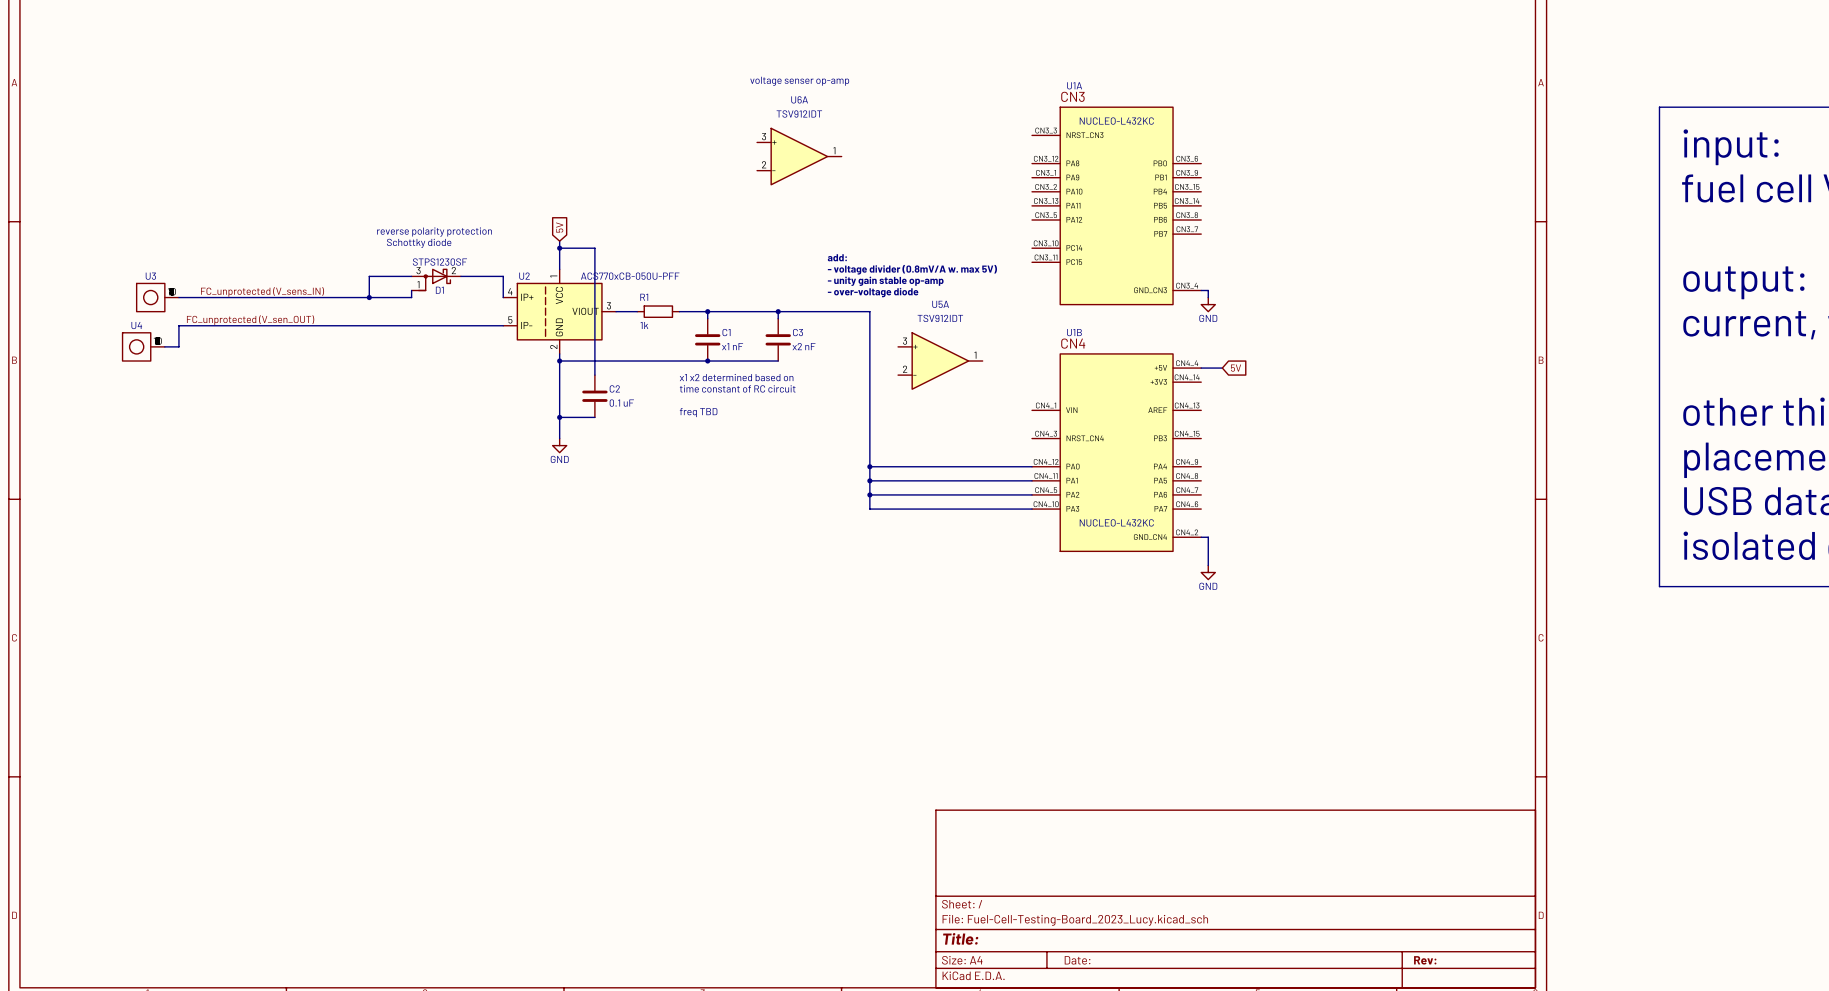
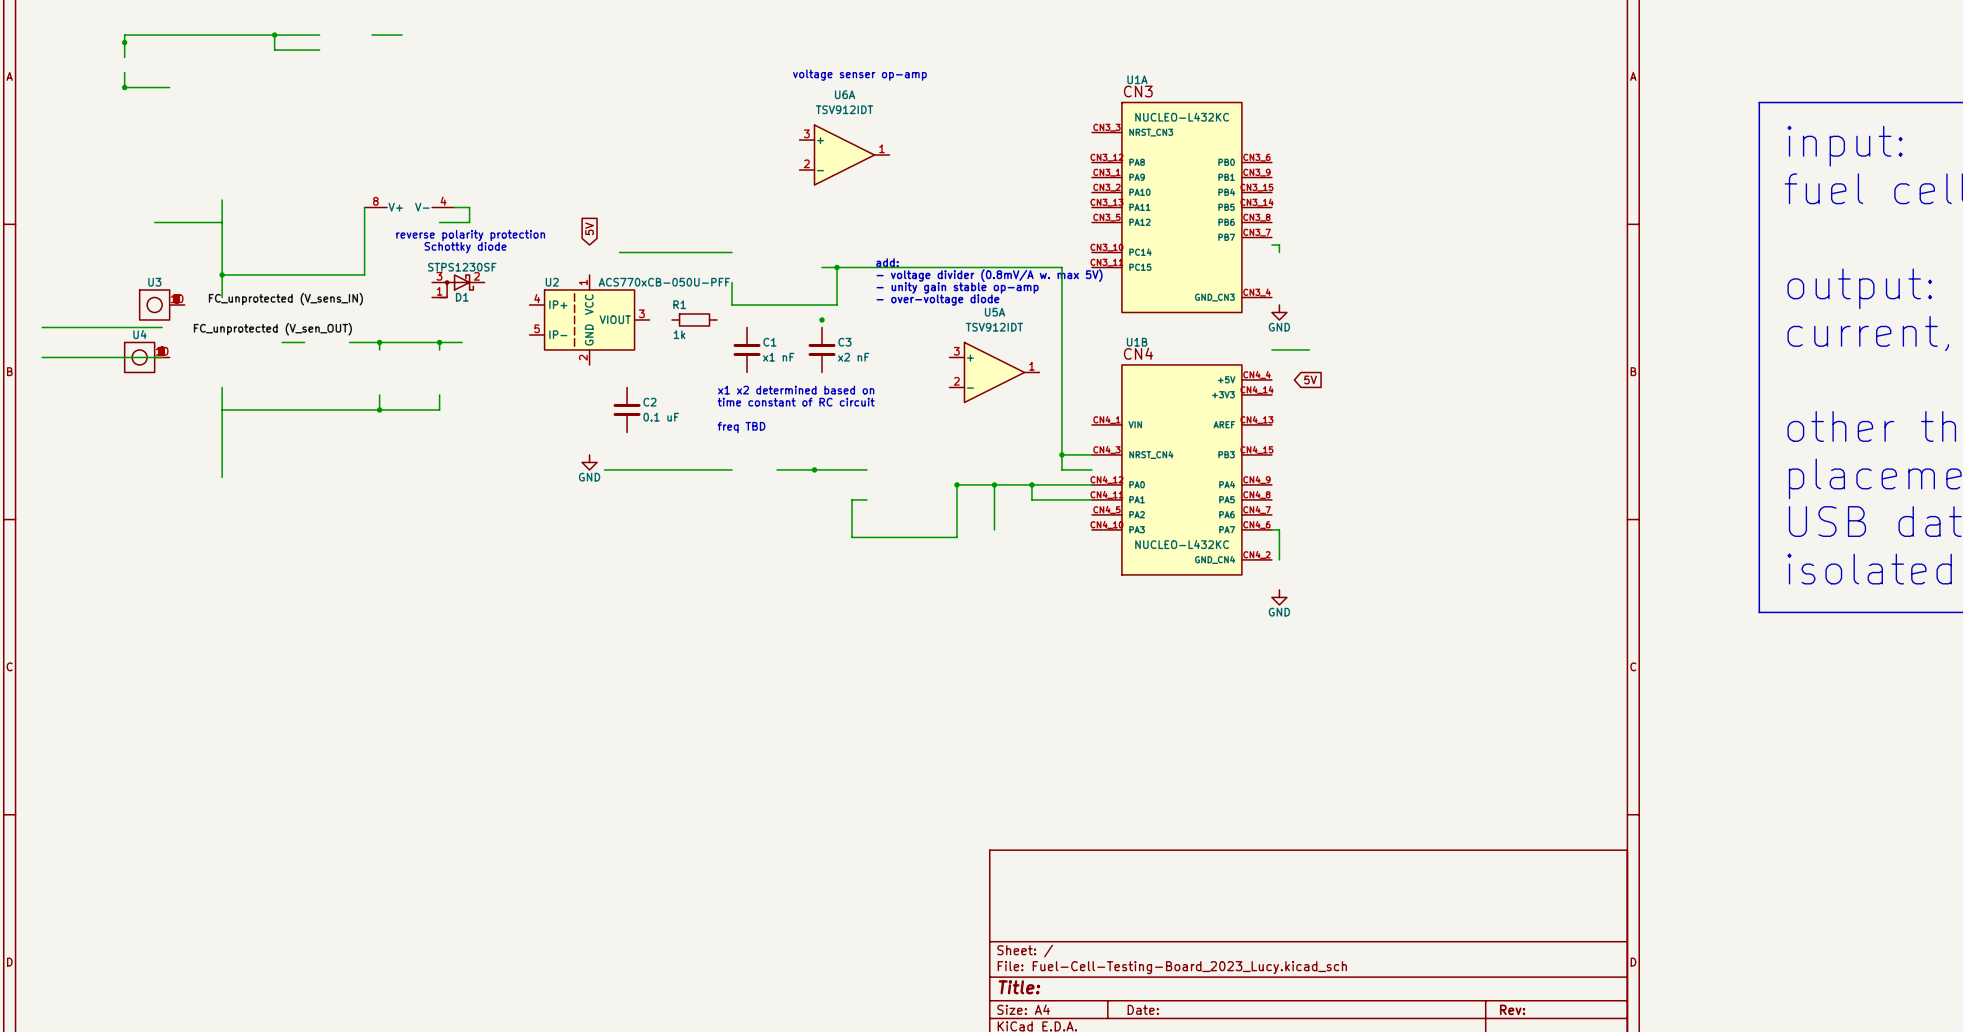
wire: none -> (274, 35) (274, 50) (319, 50)
junction: none -> (274, 35)
wire: none -> (319, 35) (124, 35) (124, 57)
wire: none -> (372, 35) (402, 35)
junction: none -> (124, 42)
wire: none -> (124, 72) (124, 87) (169, 87)
junction: none -> (124, 87)
wire: none -> (222, 200) (222, 297)
wire: none -> (364, 207) (364, 274) (222, 274)
part: none -> (409, 207)
wire: none -> (454, 207) (469, 207) (469, 222) (439, 222)
wire: none -> (154, 222) (222, 222)
wire: (559, 241) (559, 269) -> none
wire: (559, 248) (587, 248) -> none
junction: (559, 248) -> none
wire: (594, 248) (594, 375) -> (627, 252) (732, 252)
wire: none -> (822, 267) (1061, 267) (1061, 469) (1091, 469)
wire: none -> (837, 267) (837, 304) (732, 304) (732, 282)
junction: none -> (837, 267)
junction: none -> (222, 274)
wire: (411, 276) (369, 276) (369, 297) -> none
wire: (460, 276) (503, 276) (503, 297) -> none
wire: (411, 290) (411, 297) (178, 297) -> none
wire: (1201, 290) (1208, 290) (1208, 297) -> (1271, 245) (1279, 245) (1279, 252)
junction: (369, 297) -> none
wire: (616, 311) (637, 311) -> none
wire: (679, 311) (869, 311) (869, 509) (1032, 509) -> none
wire: (707, 311) (707, 318) -> none
junction: (707, 311) -> none
wire: (778, 311) (778, 318) -> none
wire: none -> (42, 327) (162, 327)
wire: (503, 325) (178, 325) (178, 346) (164, 346) -> none
wire: none -> (282, 342) (304, 342)
wire: none -> (349, 342) (462, 342)
wire: none -> (379, 342) (379, 349)
junction: none -> (379, 342)
wire: none -> (439, 342) (439, 349)
junction: none -> (439, 342)
wire: none -> (1271, 349) (1309, 349)
wire: none -> (42, 357) (162, 357)
wire: (559, 353) (559, 438) -> none
wire: (559, 361) (778, 361) -> none
junction: (559, 361) -> none
junction: (707, 361) -> none
wire: (1201, 368) (1222, 368) -> none
wire: none -> (222, 387) (222, 477)
wire: none -> (379, 394) (379, 409)
wire: none -> (439, 394) (439, 409) (222, 409)
junction: none -> (379, 409)
wire: (559, 417) (594, 417) -> none
junction: (559, 417) -> none
wire: none -> (1061, 454) (1091, 454)
junction: none -> (1061, 454)
wire: none -> (604, 469) (732, 469)
wire: none -> (777, 469) (866, 469)
junction: none -> (814, 469)
wire: (869, 466) (905, 466) -> (866, 499) (852, 499) (852, 537) (956, 537) (956, 484)
junction: (869, 466) -> none
junction: none -> (956, 484)
wire: none -> (994, 484) (994, 529)
junction: none -> (994, 484)
junction: none -> (1031, 484)
wire: (869, 480) (975, 480) -> (1031, 484) (1031, 499)
junction: (869, 480) -> none
wire: (869, 494) (1032, 494) -> none
junction: (869, 494) -> none
wire: (1201, 537) (1208, 537) (1208, 565) -> (1271, 529) (1279, 529) (1279, 559)

